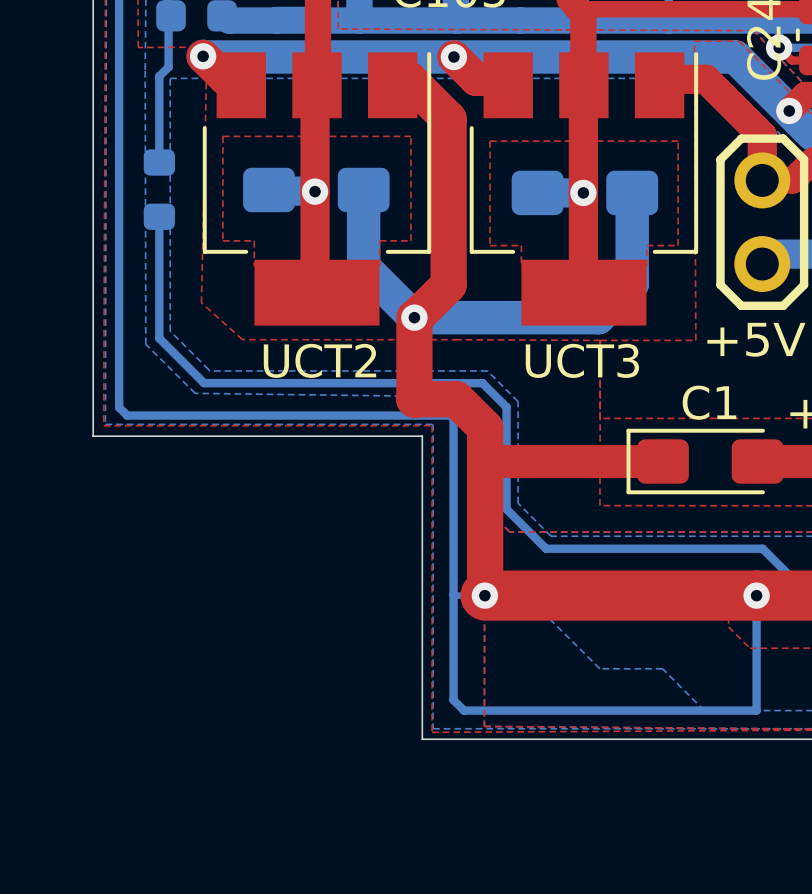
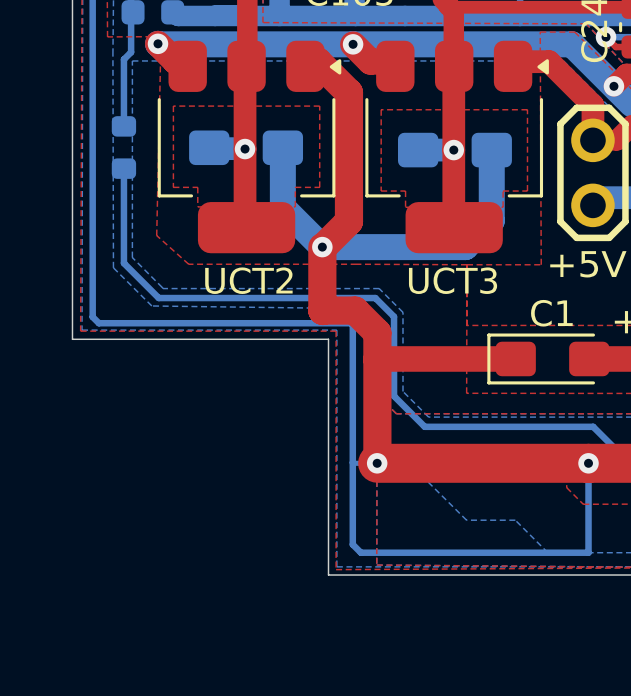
UCT2 footprint: [202, 52, 432, 326] -> [157, 40, 342, 254]
UCT3 footprint: [469, 52, 699, 326] -> [365, 40, 549, 254]

